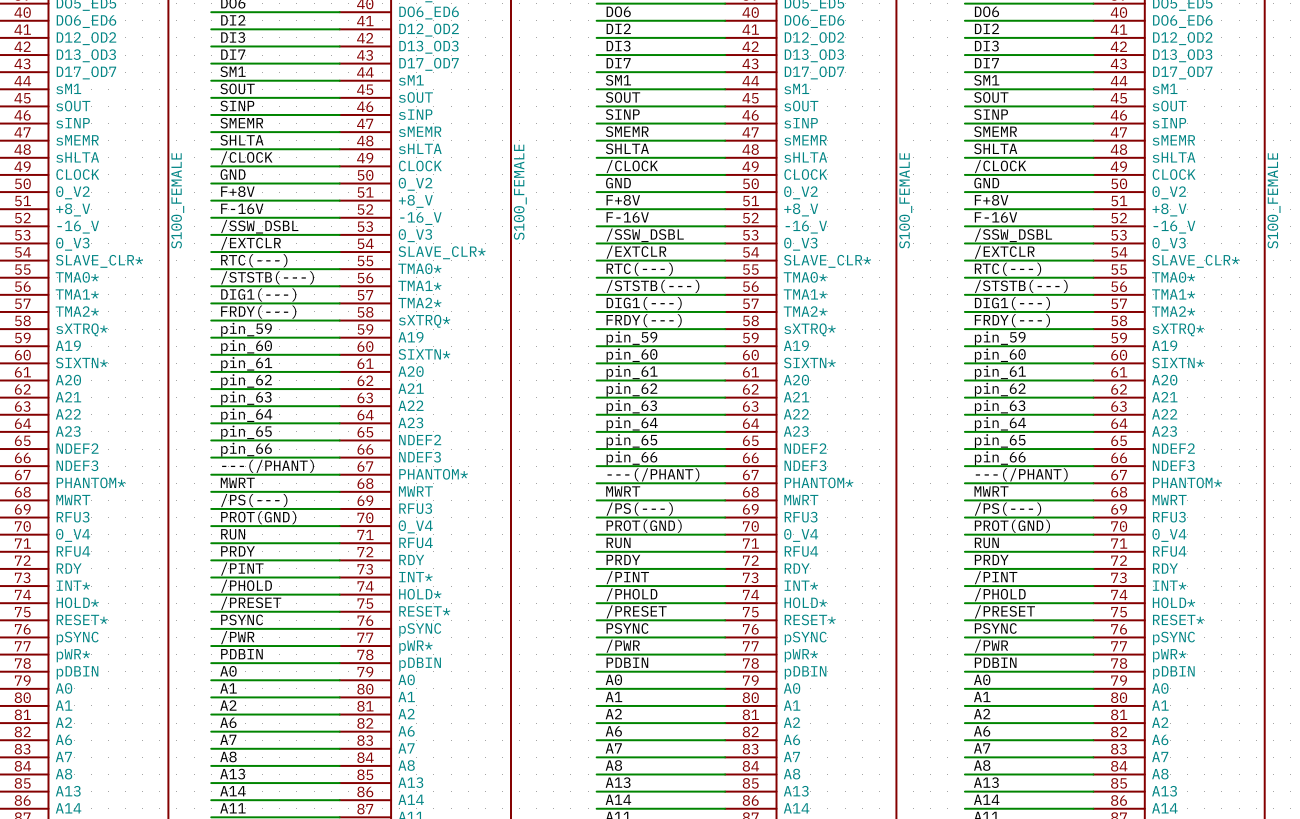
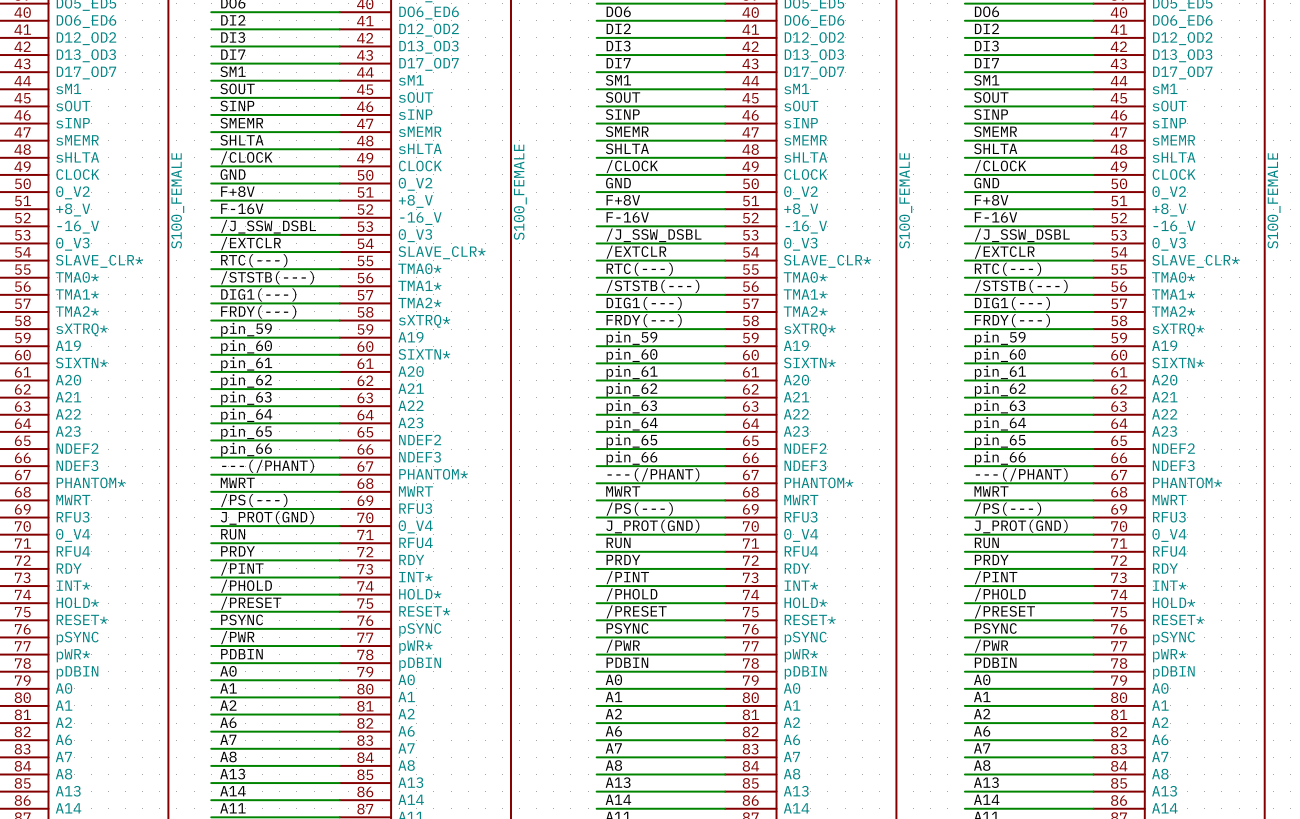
label: /SSW_DSBL (259, 226) -> /J_SSW_DSBL (268, 226)
label: /SSW_DSBL (645, 235) -> /J_SSW_DSBL (653, 235)
label: /SSW_DSBL (1013, 235) -> /J_SSW_DSBL (1022, 235)
label: PROT(GND) (258, 517) -> J_PROT(GND) (267, 517)
label: PROT(GND) (644, 526) -> J_PROT(GND) (652, 526)
label: PROT(GND) (1012, 526) -> J_PROT(GND) (1021, 526)

